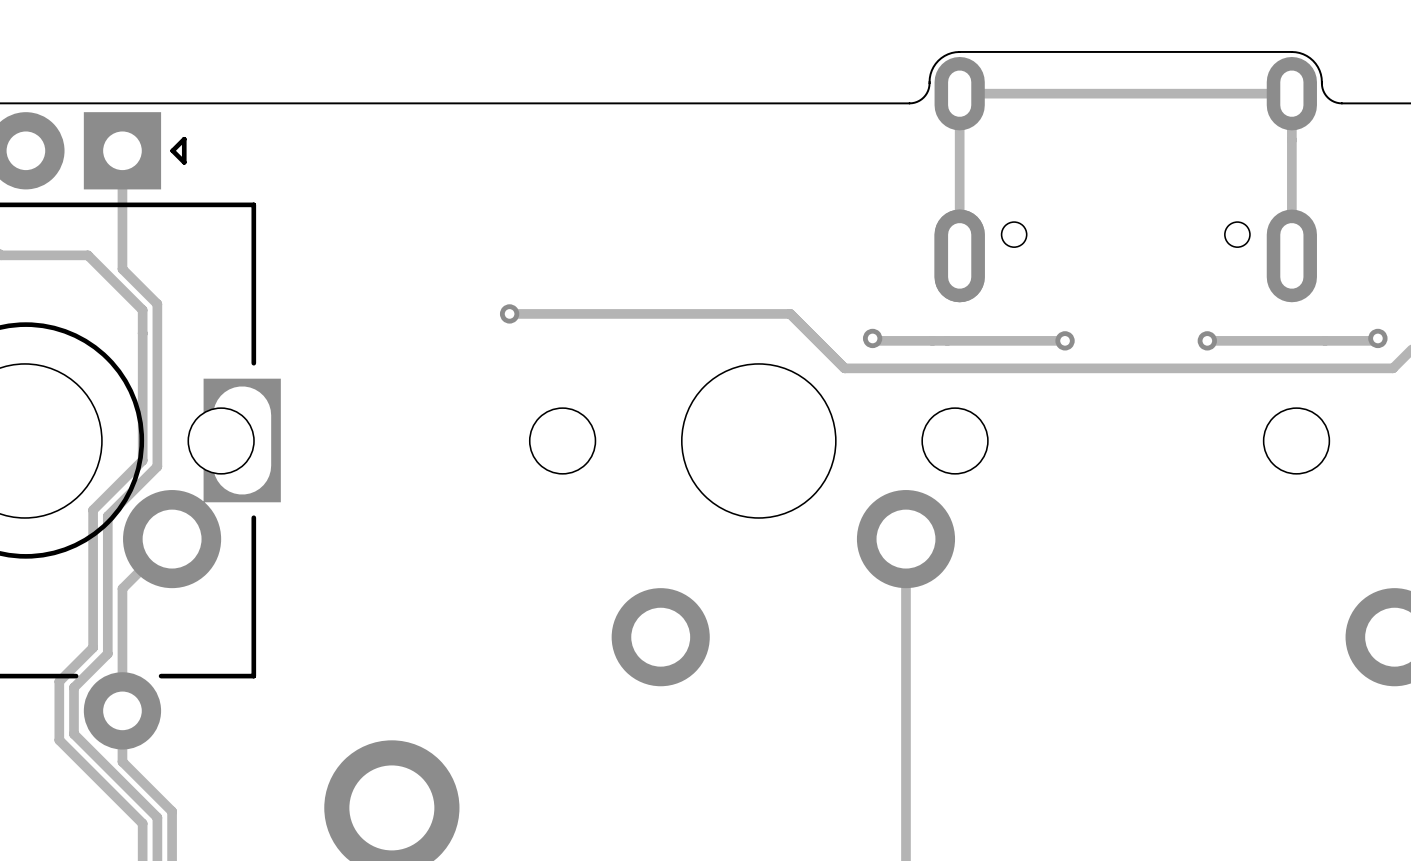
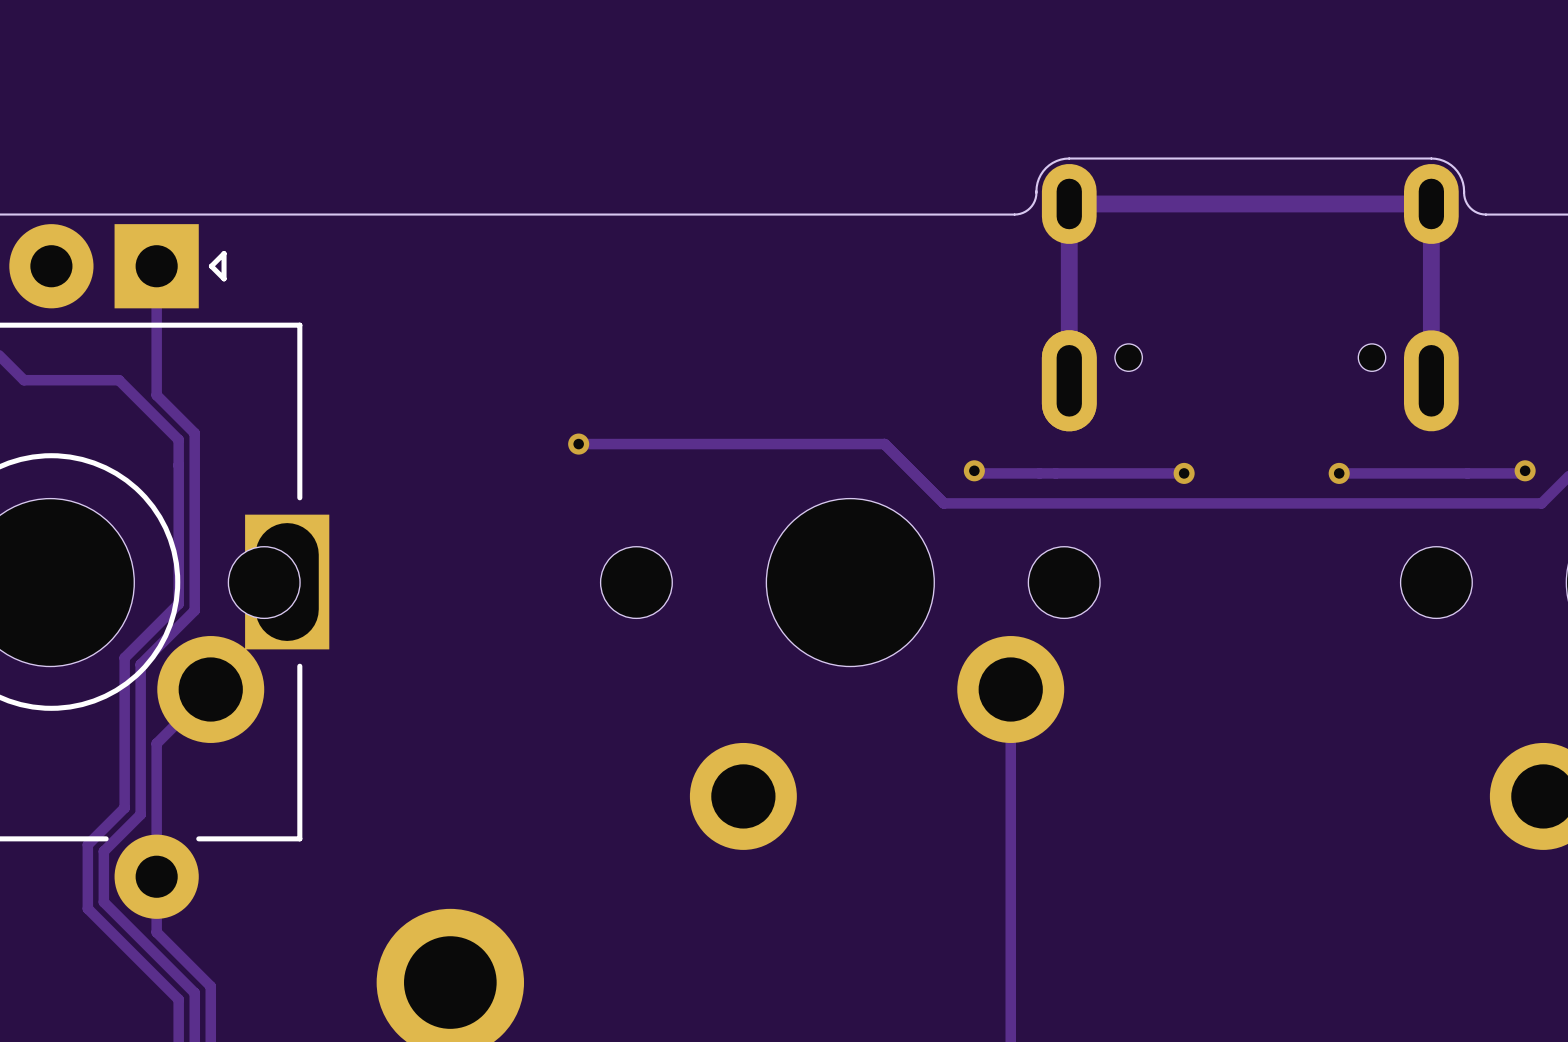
track width: thin (959, 255) (959, 93) (1291, 93) (1291, 255) -> thick (1069, 380) (1069, 203) (1431, 203) (1431, 380)

